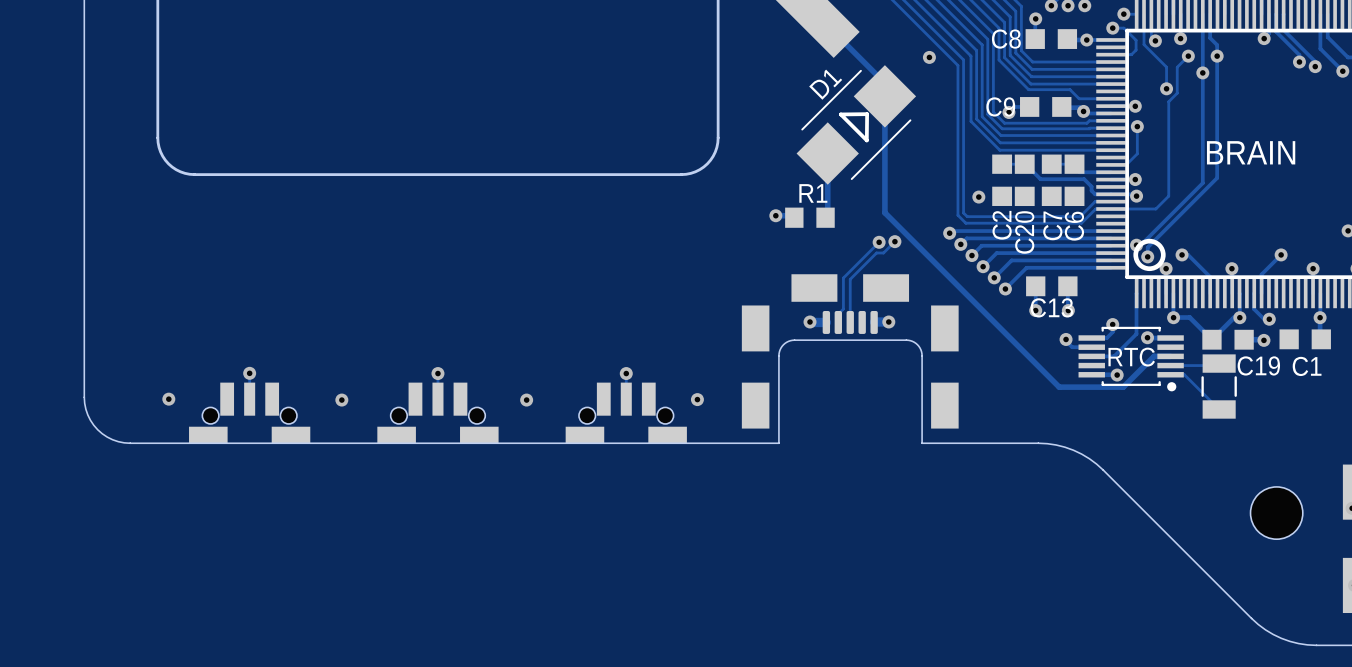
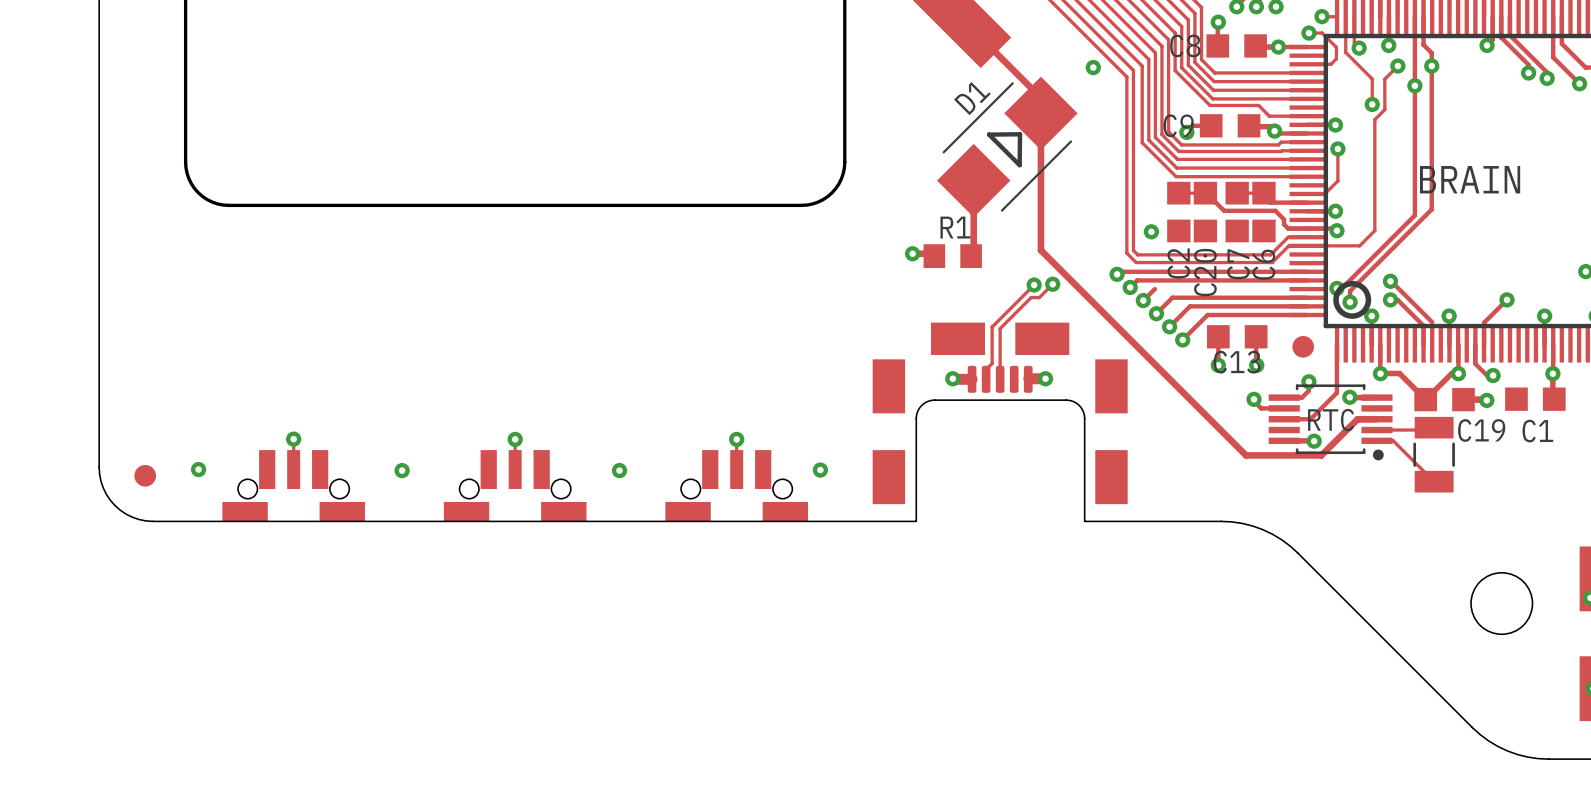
track: none -> (1390, 281) (1432, 322)
via: none -> (1390, 281)
track: (981, 245) (1110, 245) -> none
part: none -> (1303, 346)
part: none -> (145, 475)

